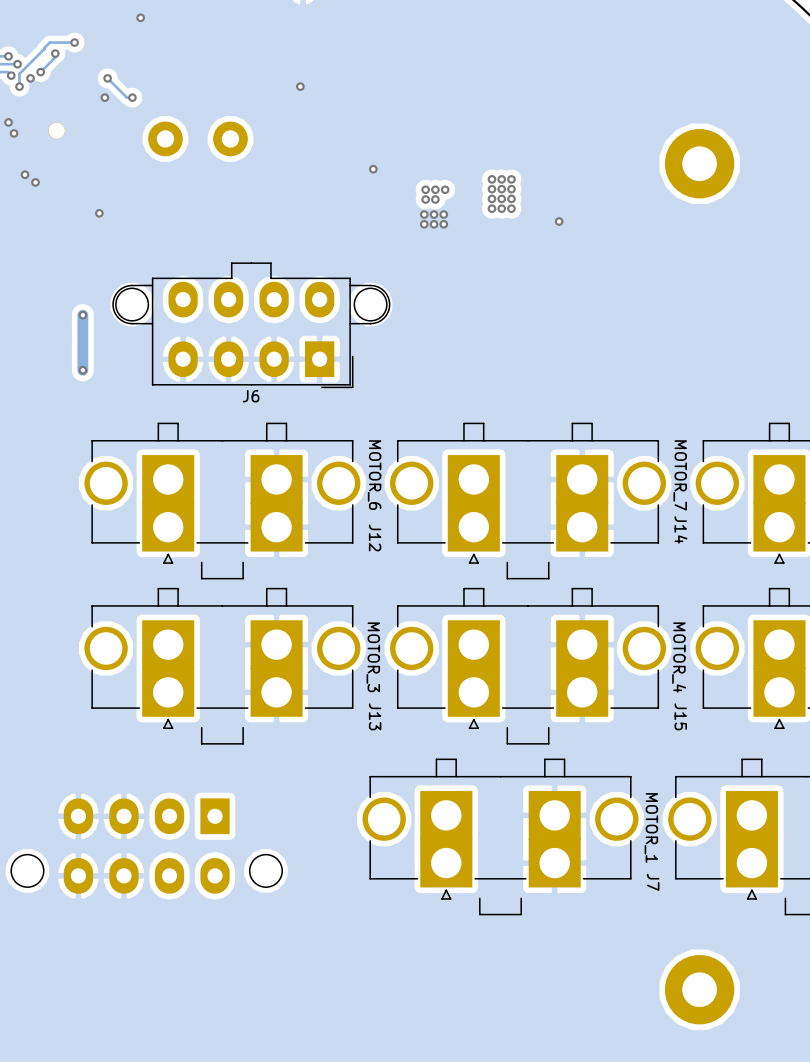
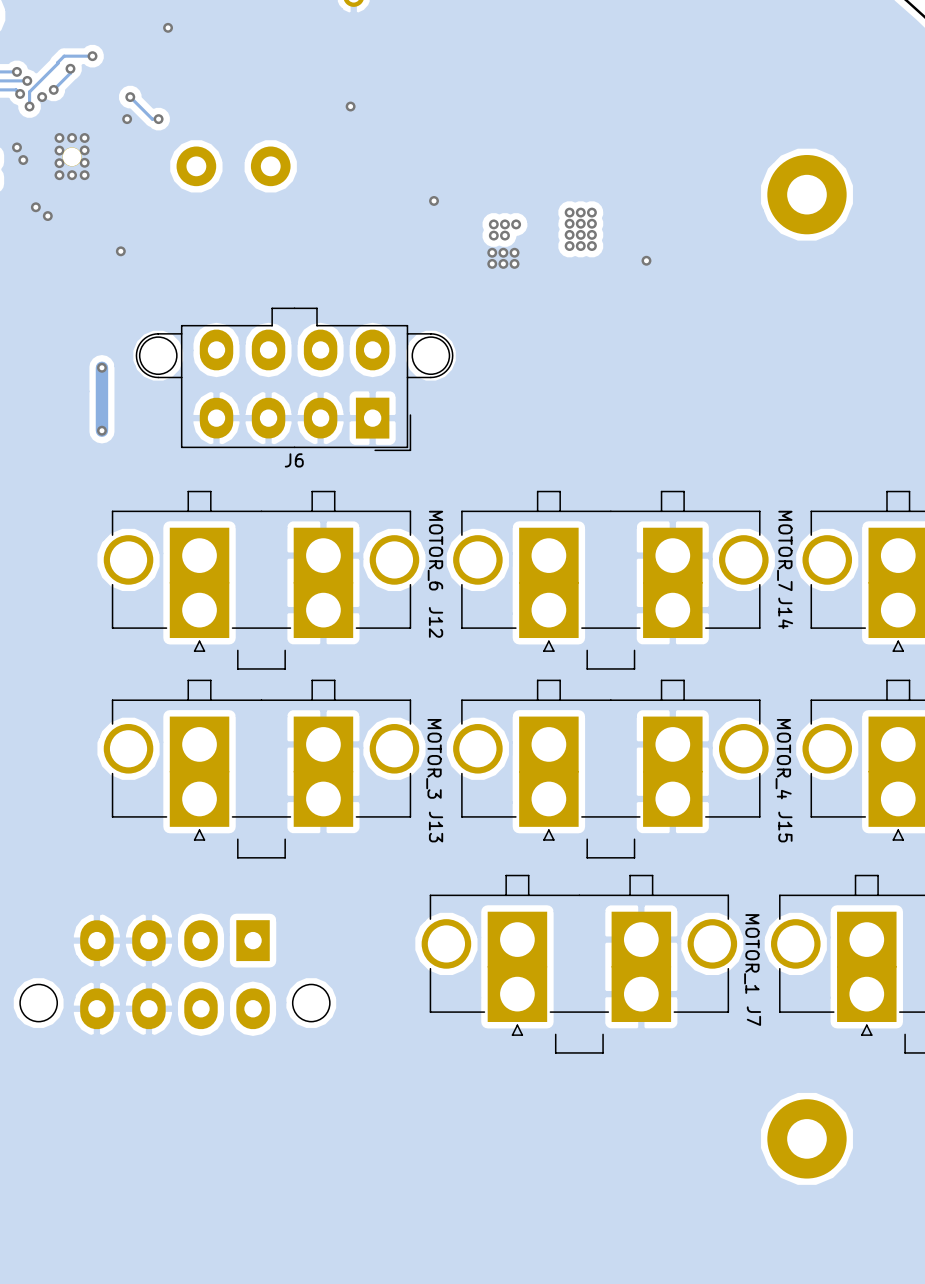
via: none -> (59, 138)
via: none -> (72, 138)
via: none -> (84, 138)
via: none -> (59, 150)
via: none -> (84, 150)
via: none -> (84, 162)
via: none -> (59, 163)
via: none -> (59, 175)
via: none -> (72, 175)
via: none -> (84, 175)

